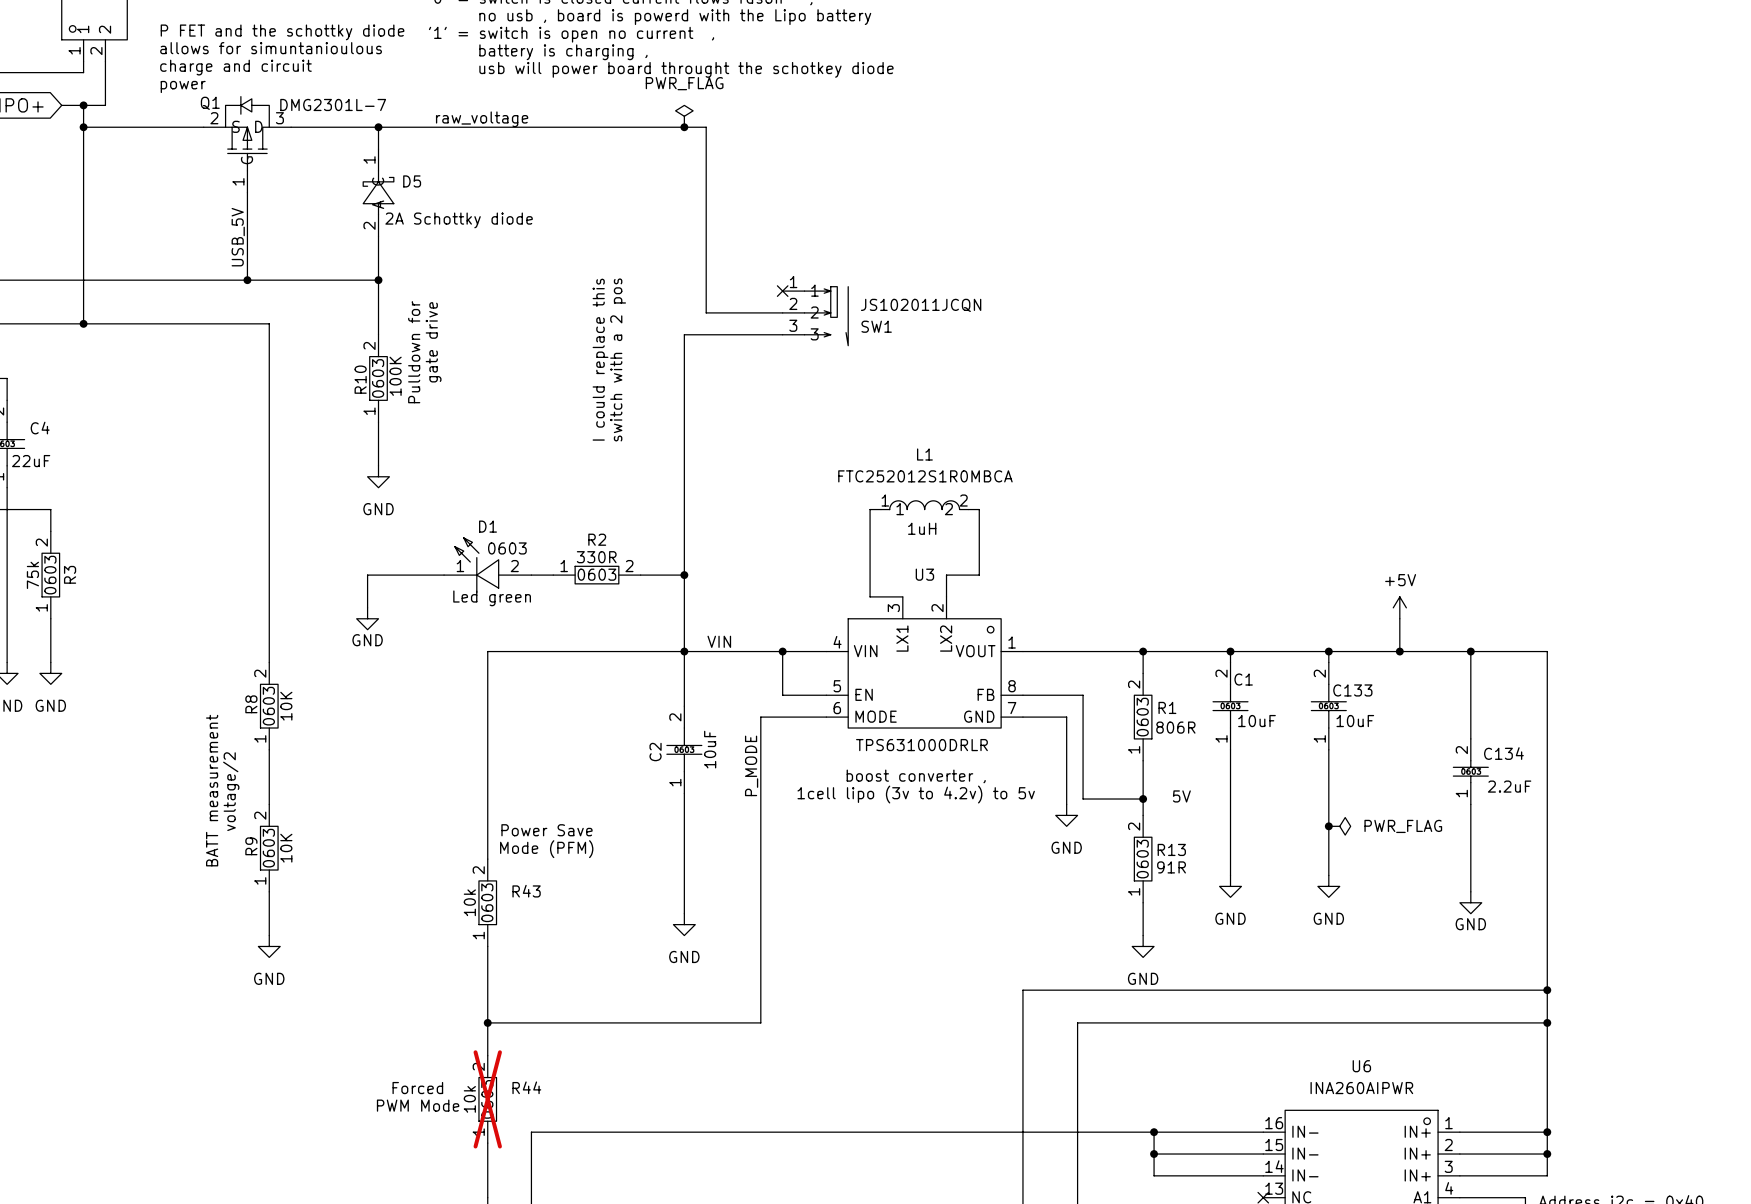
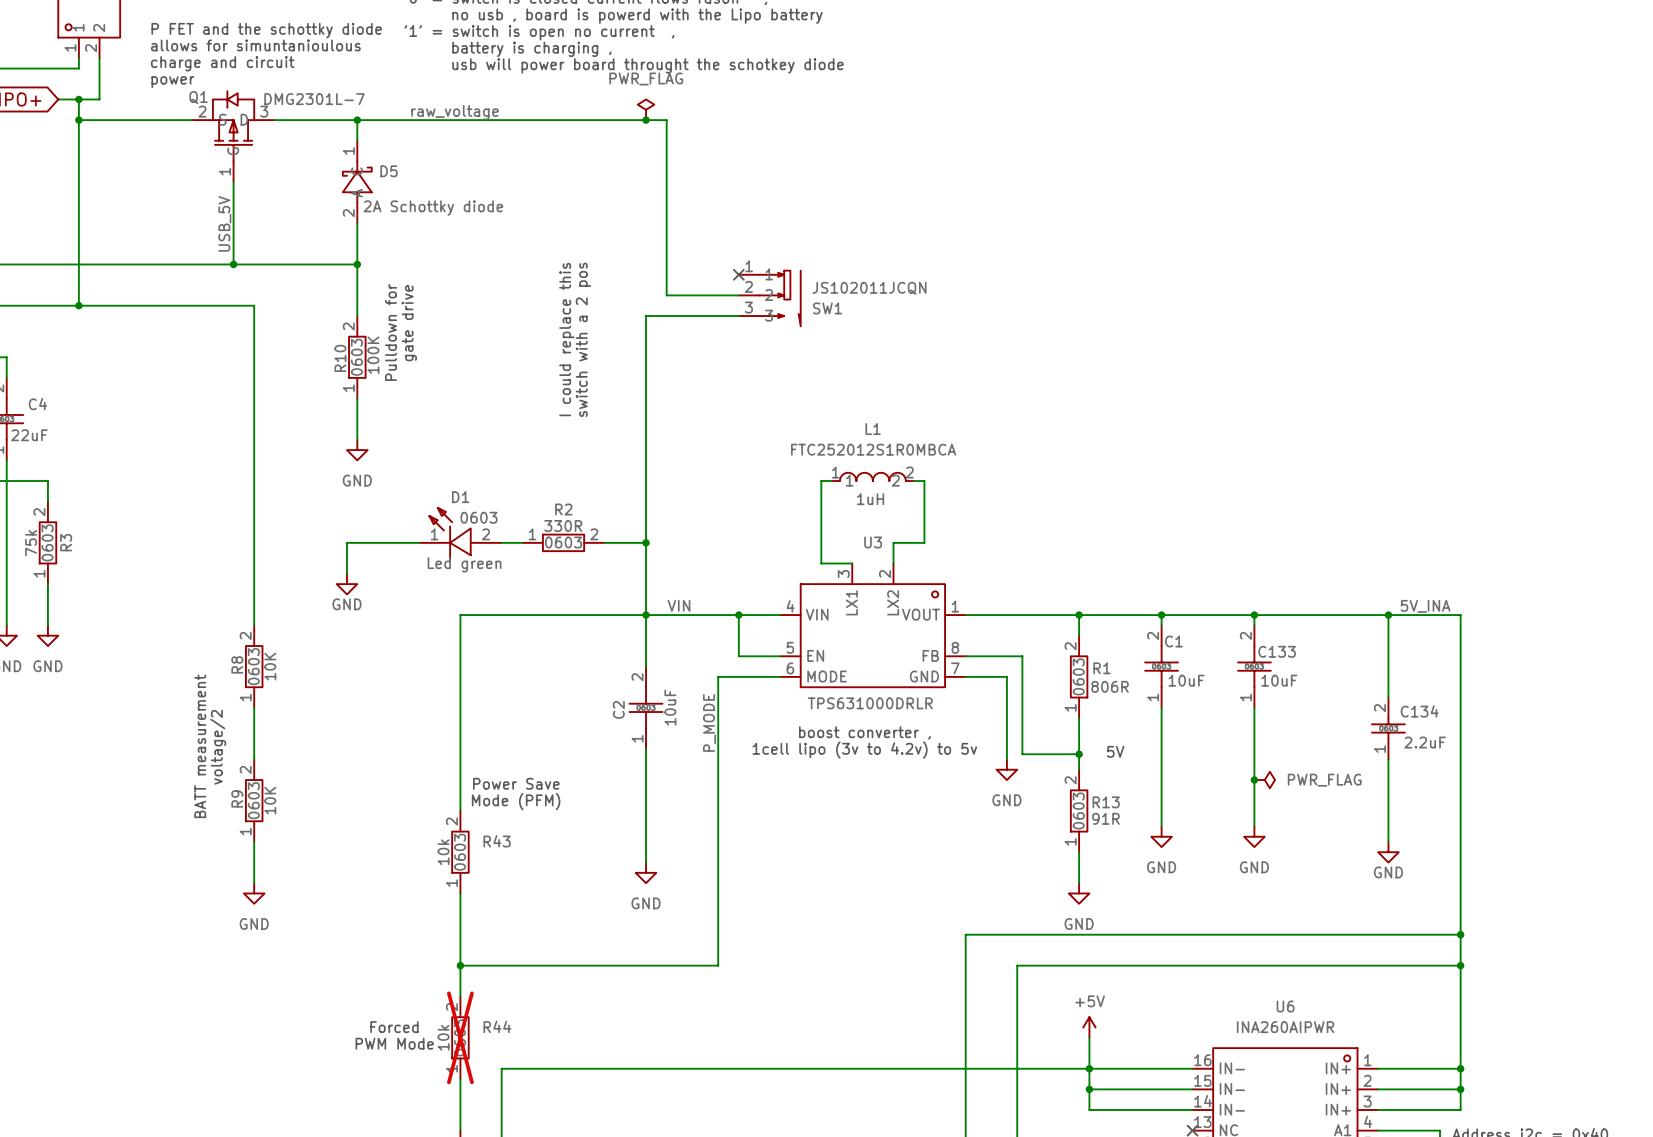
power symbol: +5V (1399, 607) -> none
wire: (1399, 618) (1399, 651) -> none
label: none -> 5V_INA (1425, 606)
junction: (1399, 651) -> none
power symbol: none -> +5V (1089, 1027)
wire: none -> (1089, 1037) (1089, 1068)

